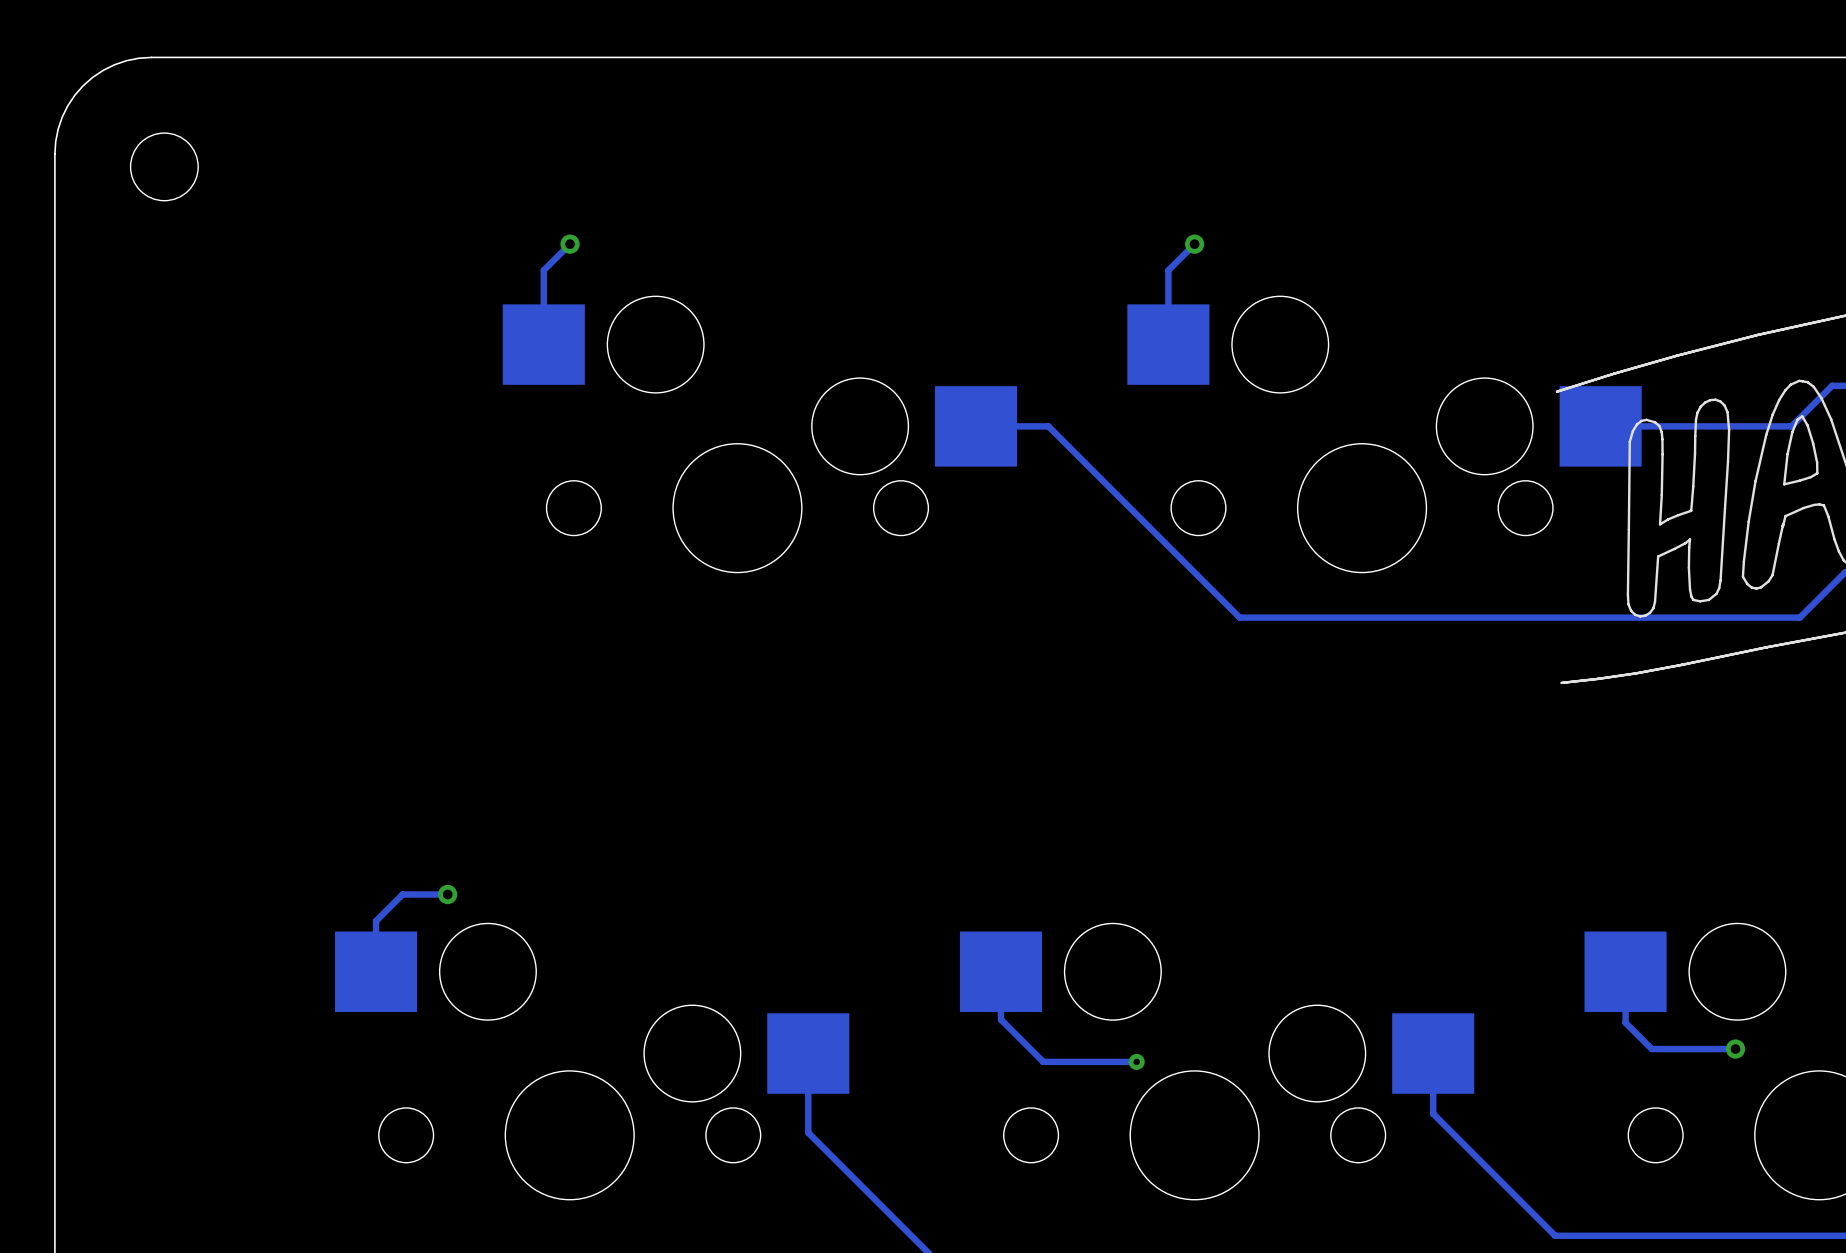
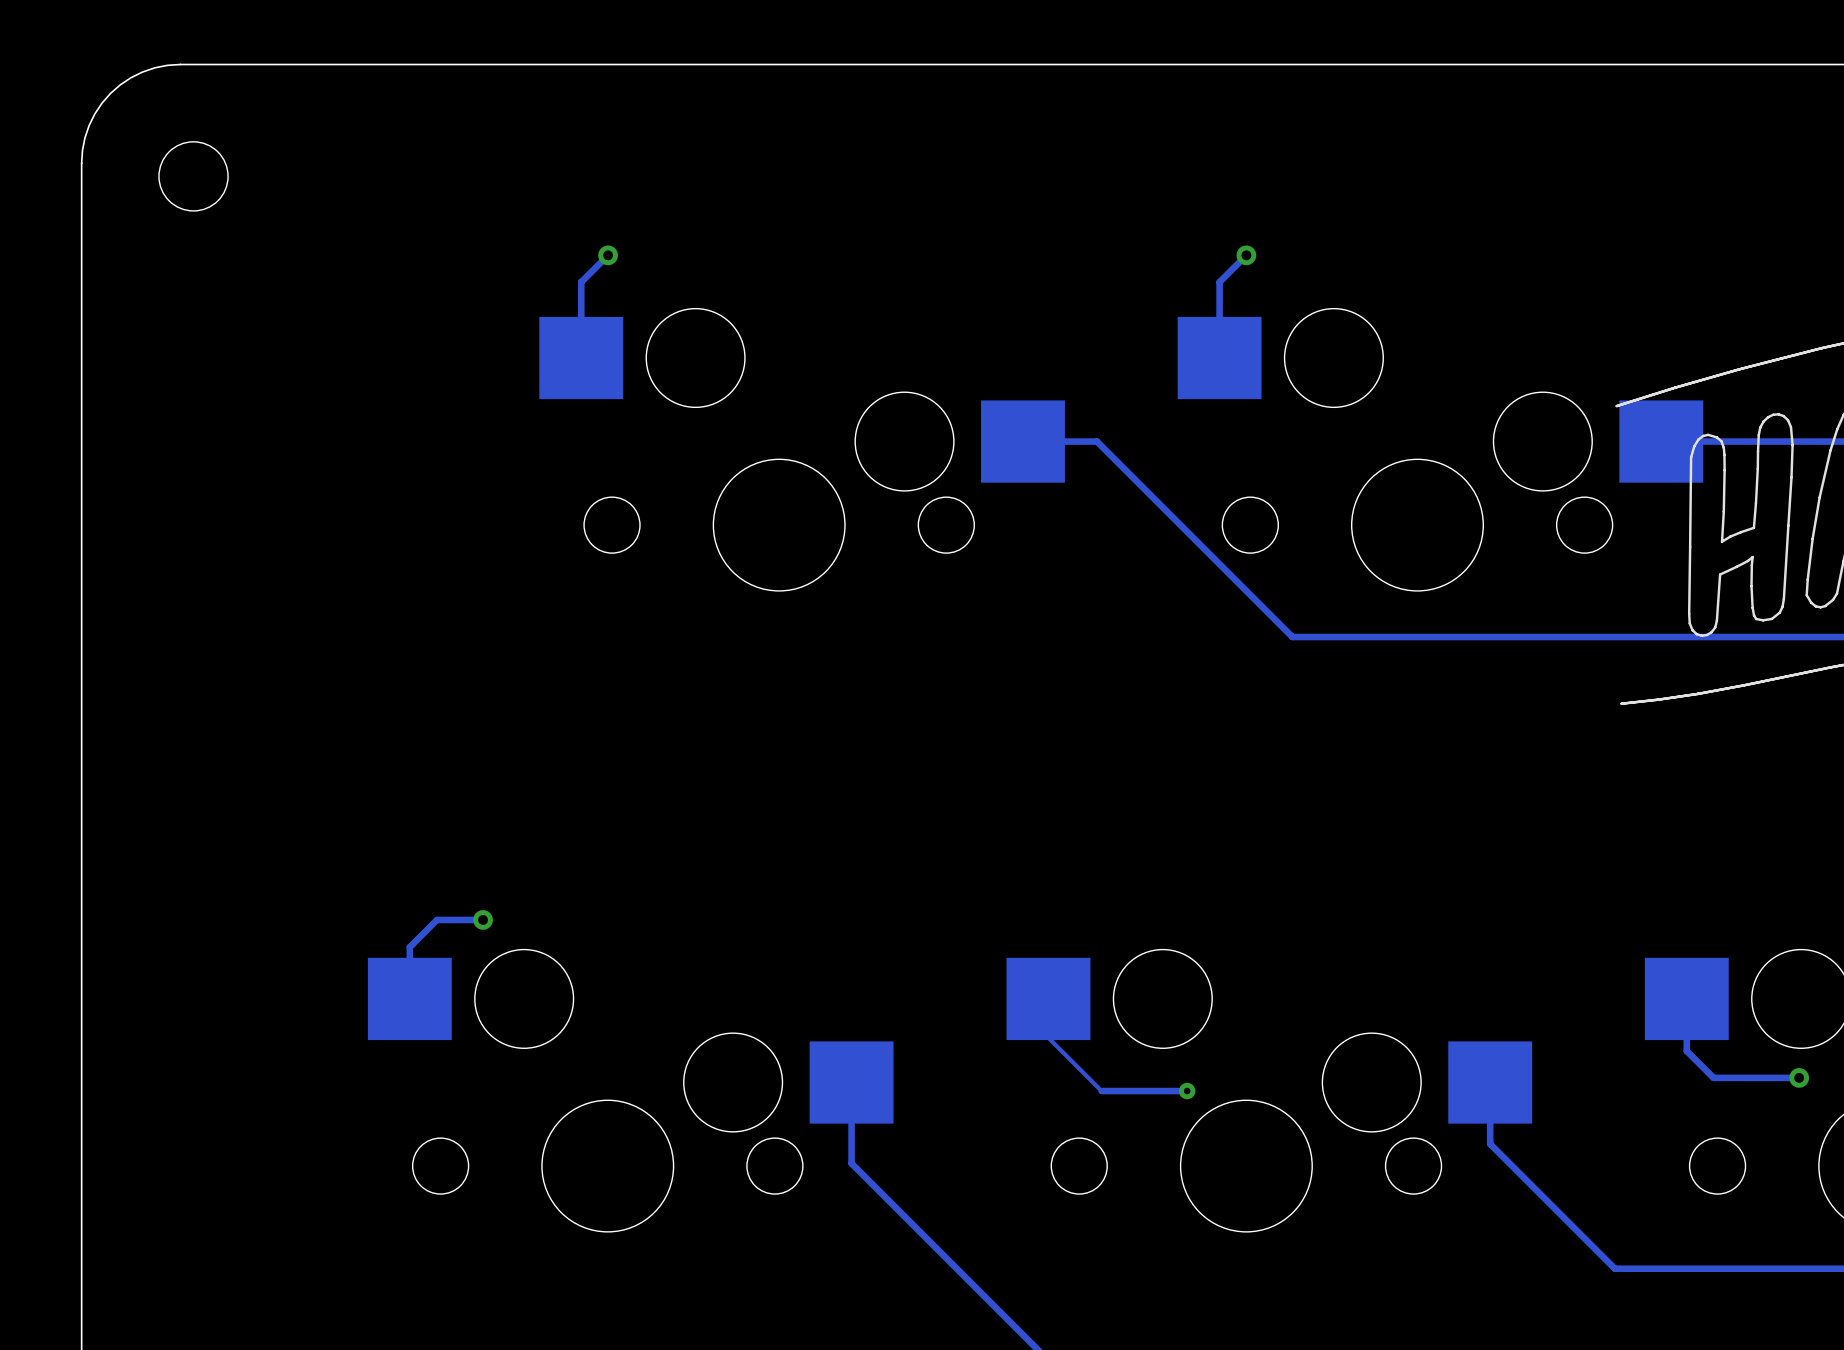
track: (1000, 971) (1000, 1019) (1043, 1061) (1052, 1061) -> (1048, 1037) (1101, 1091)

